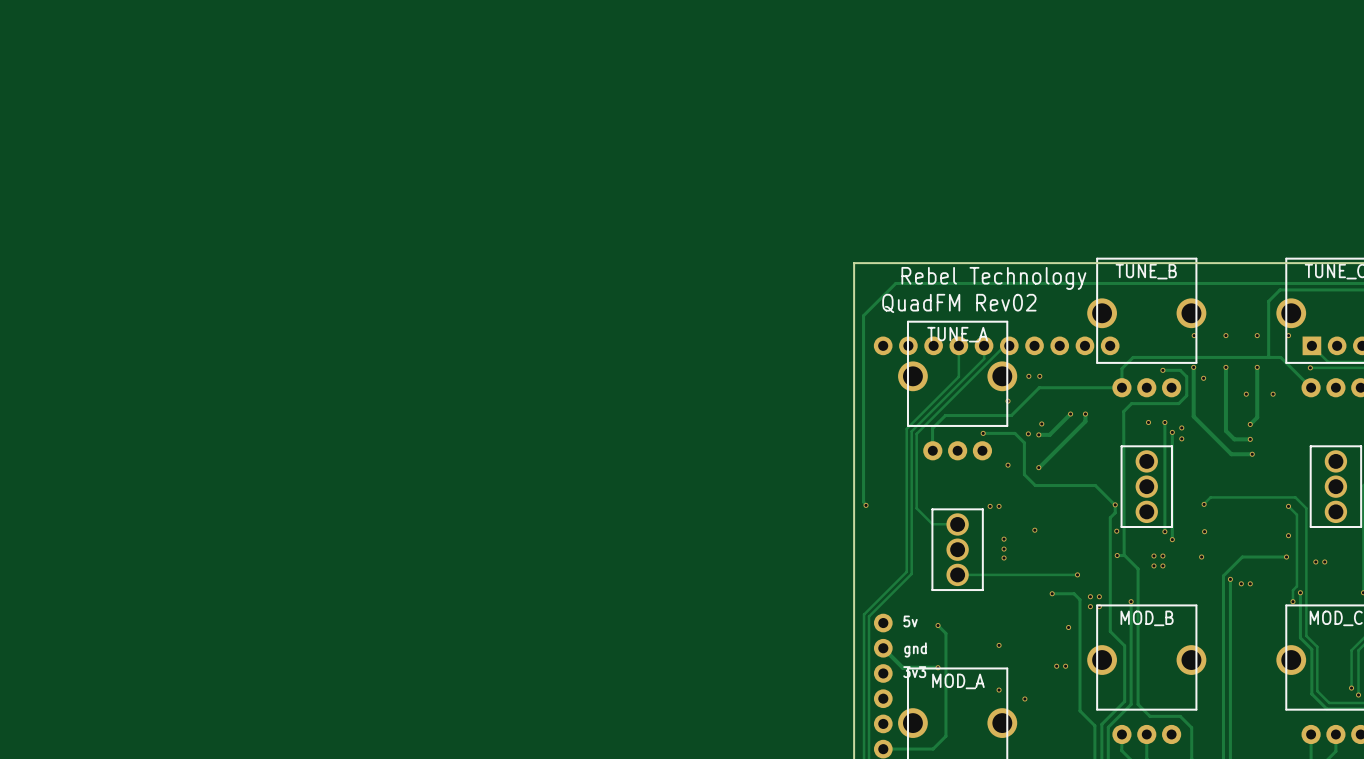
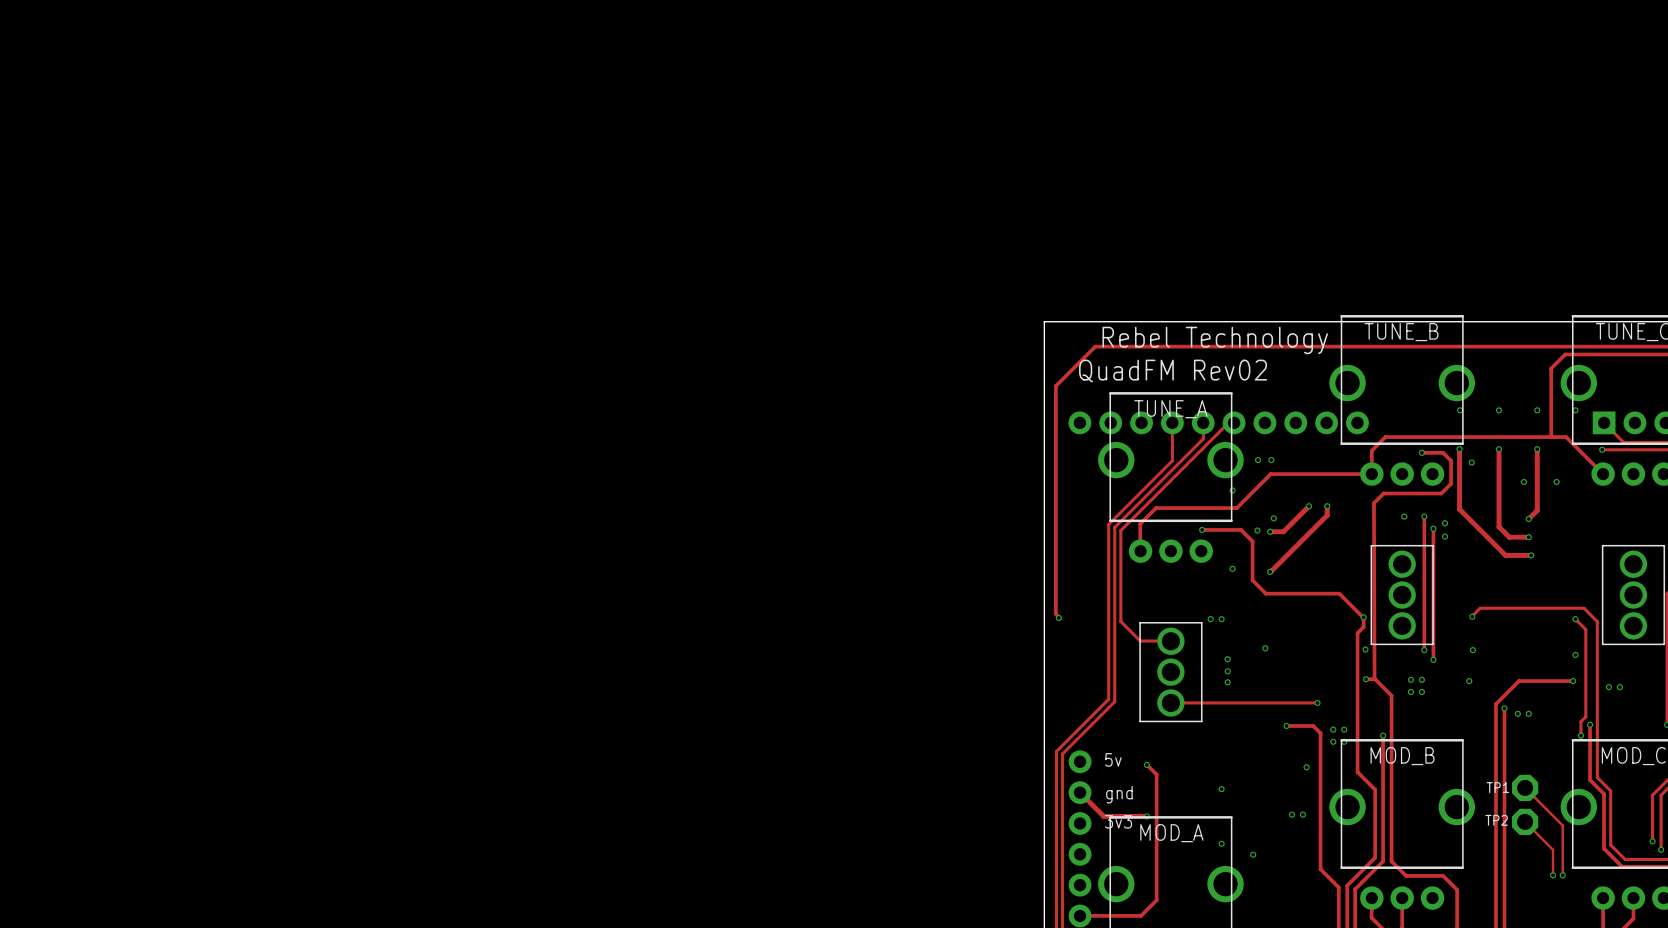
track: none -> (1525, 787) (1562, 825) (1562, 875)
TP1: none -> (1525, 787)
track: none -> (1525, 821) (1553, 849) (1553, 875)
TP2: none -> (1525, 821)
via: none -> (1553, 875)
via: none -> (1562, 875)

